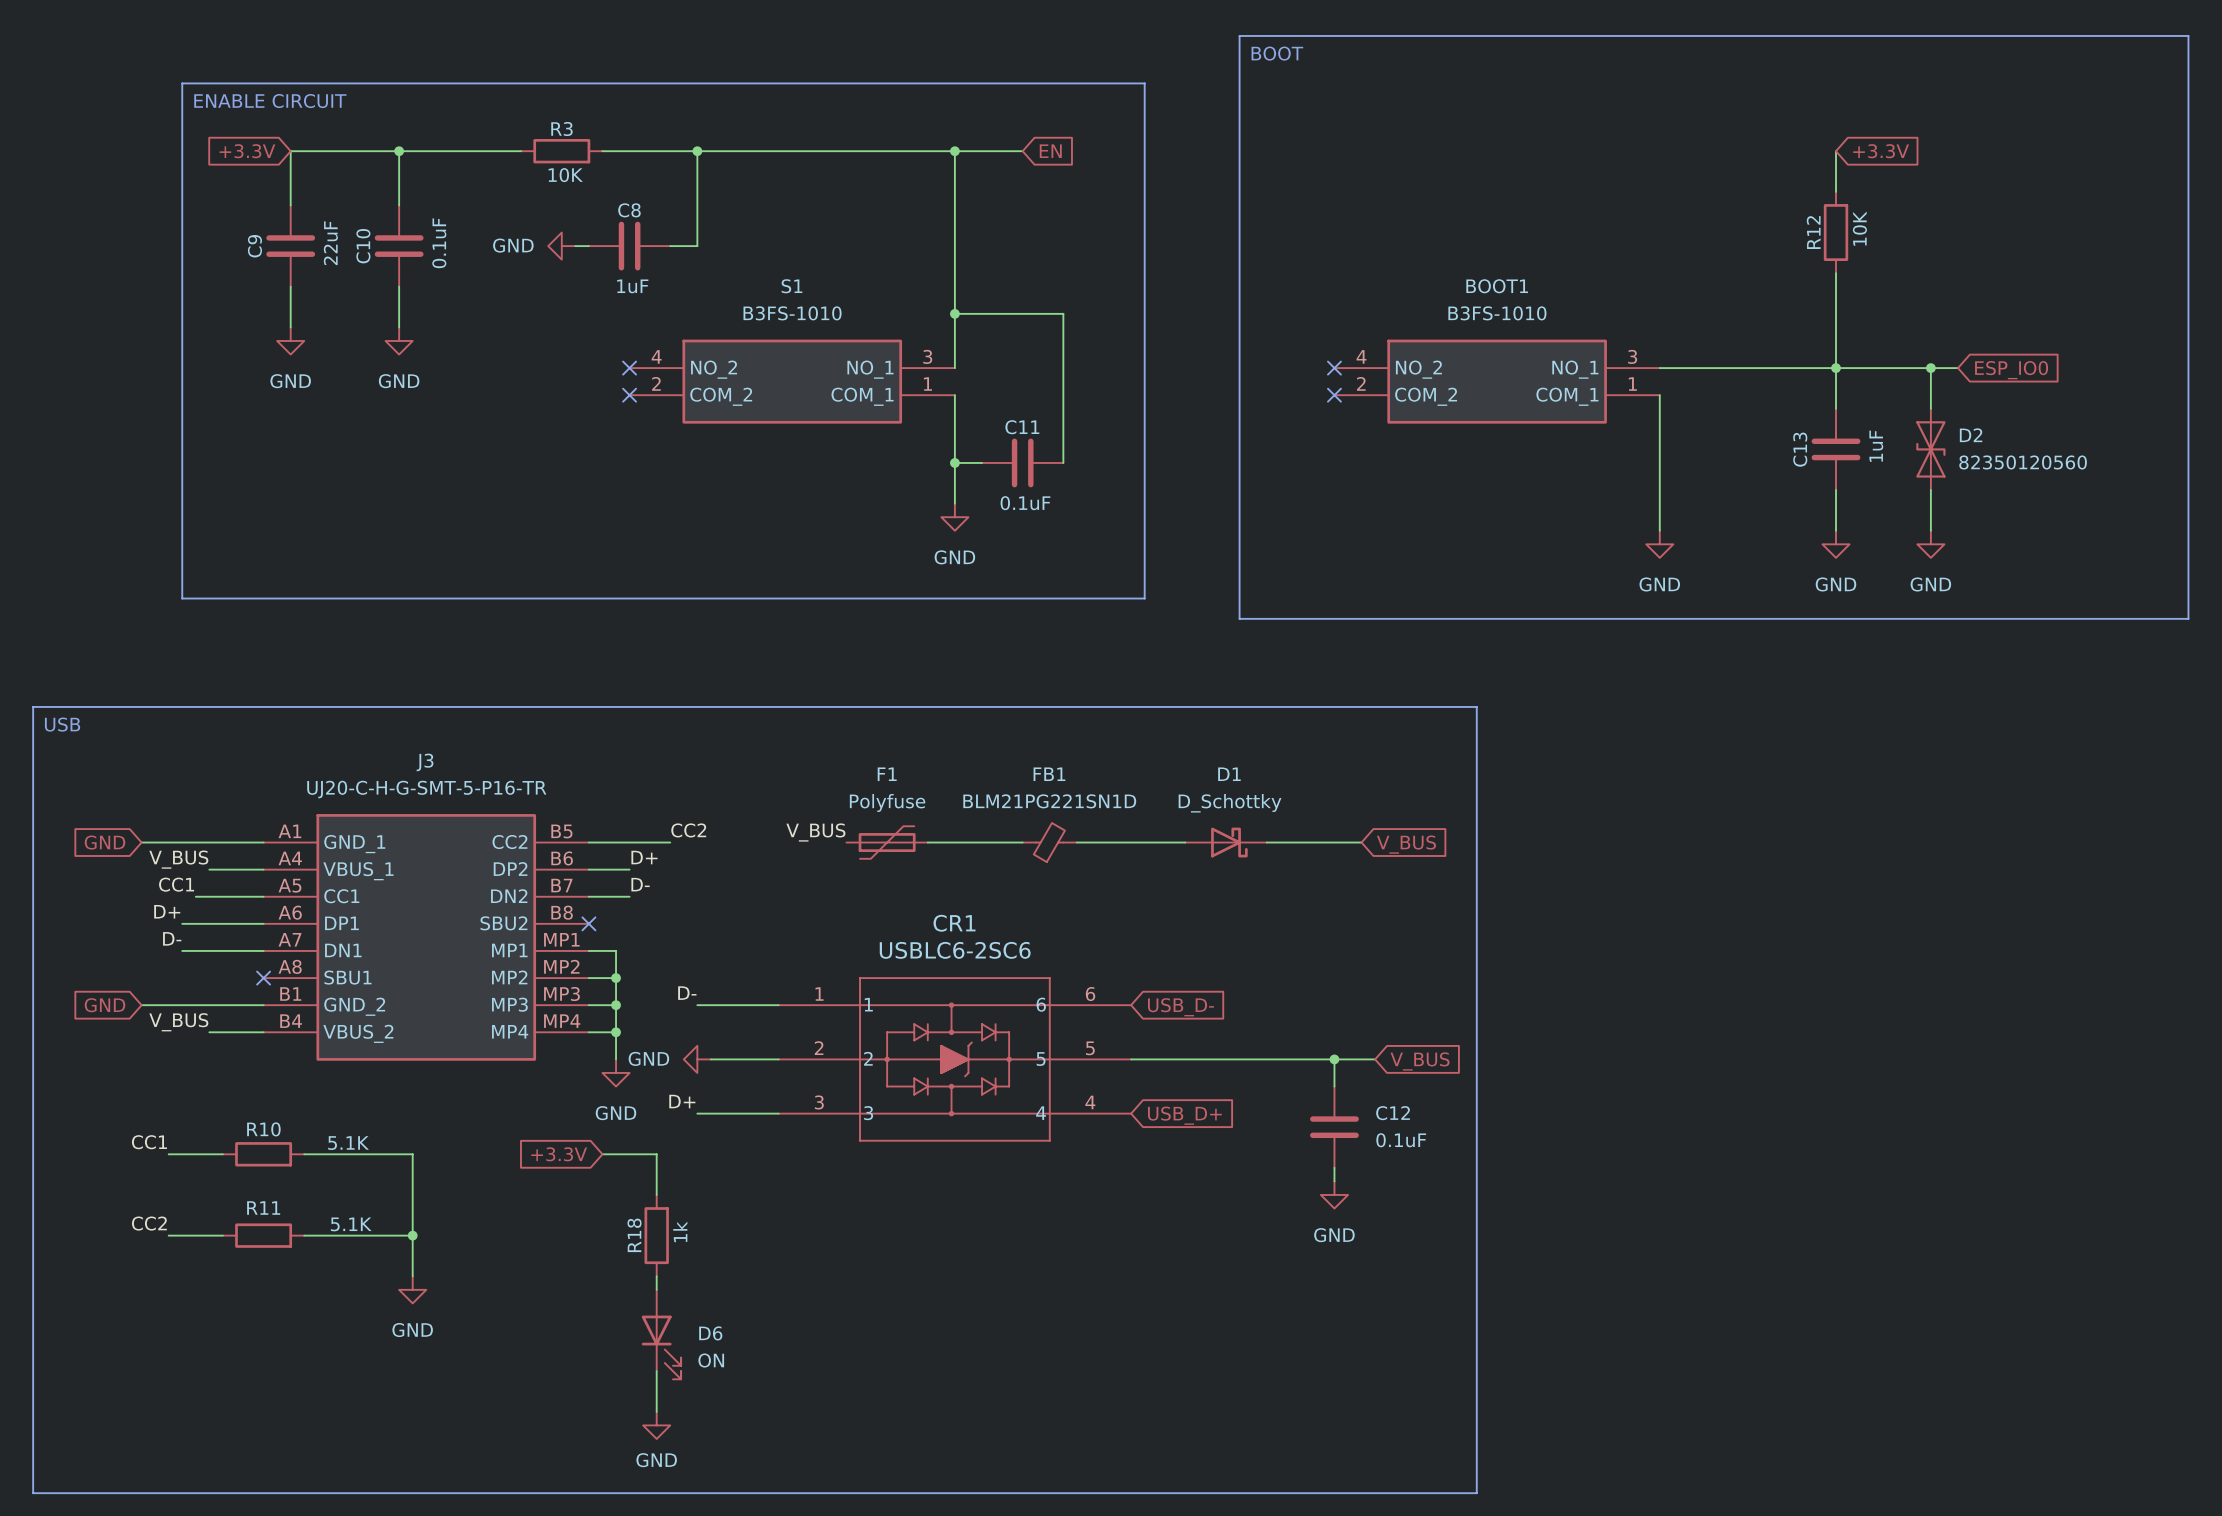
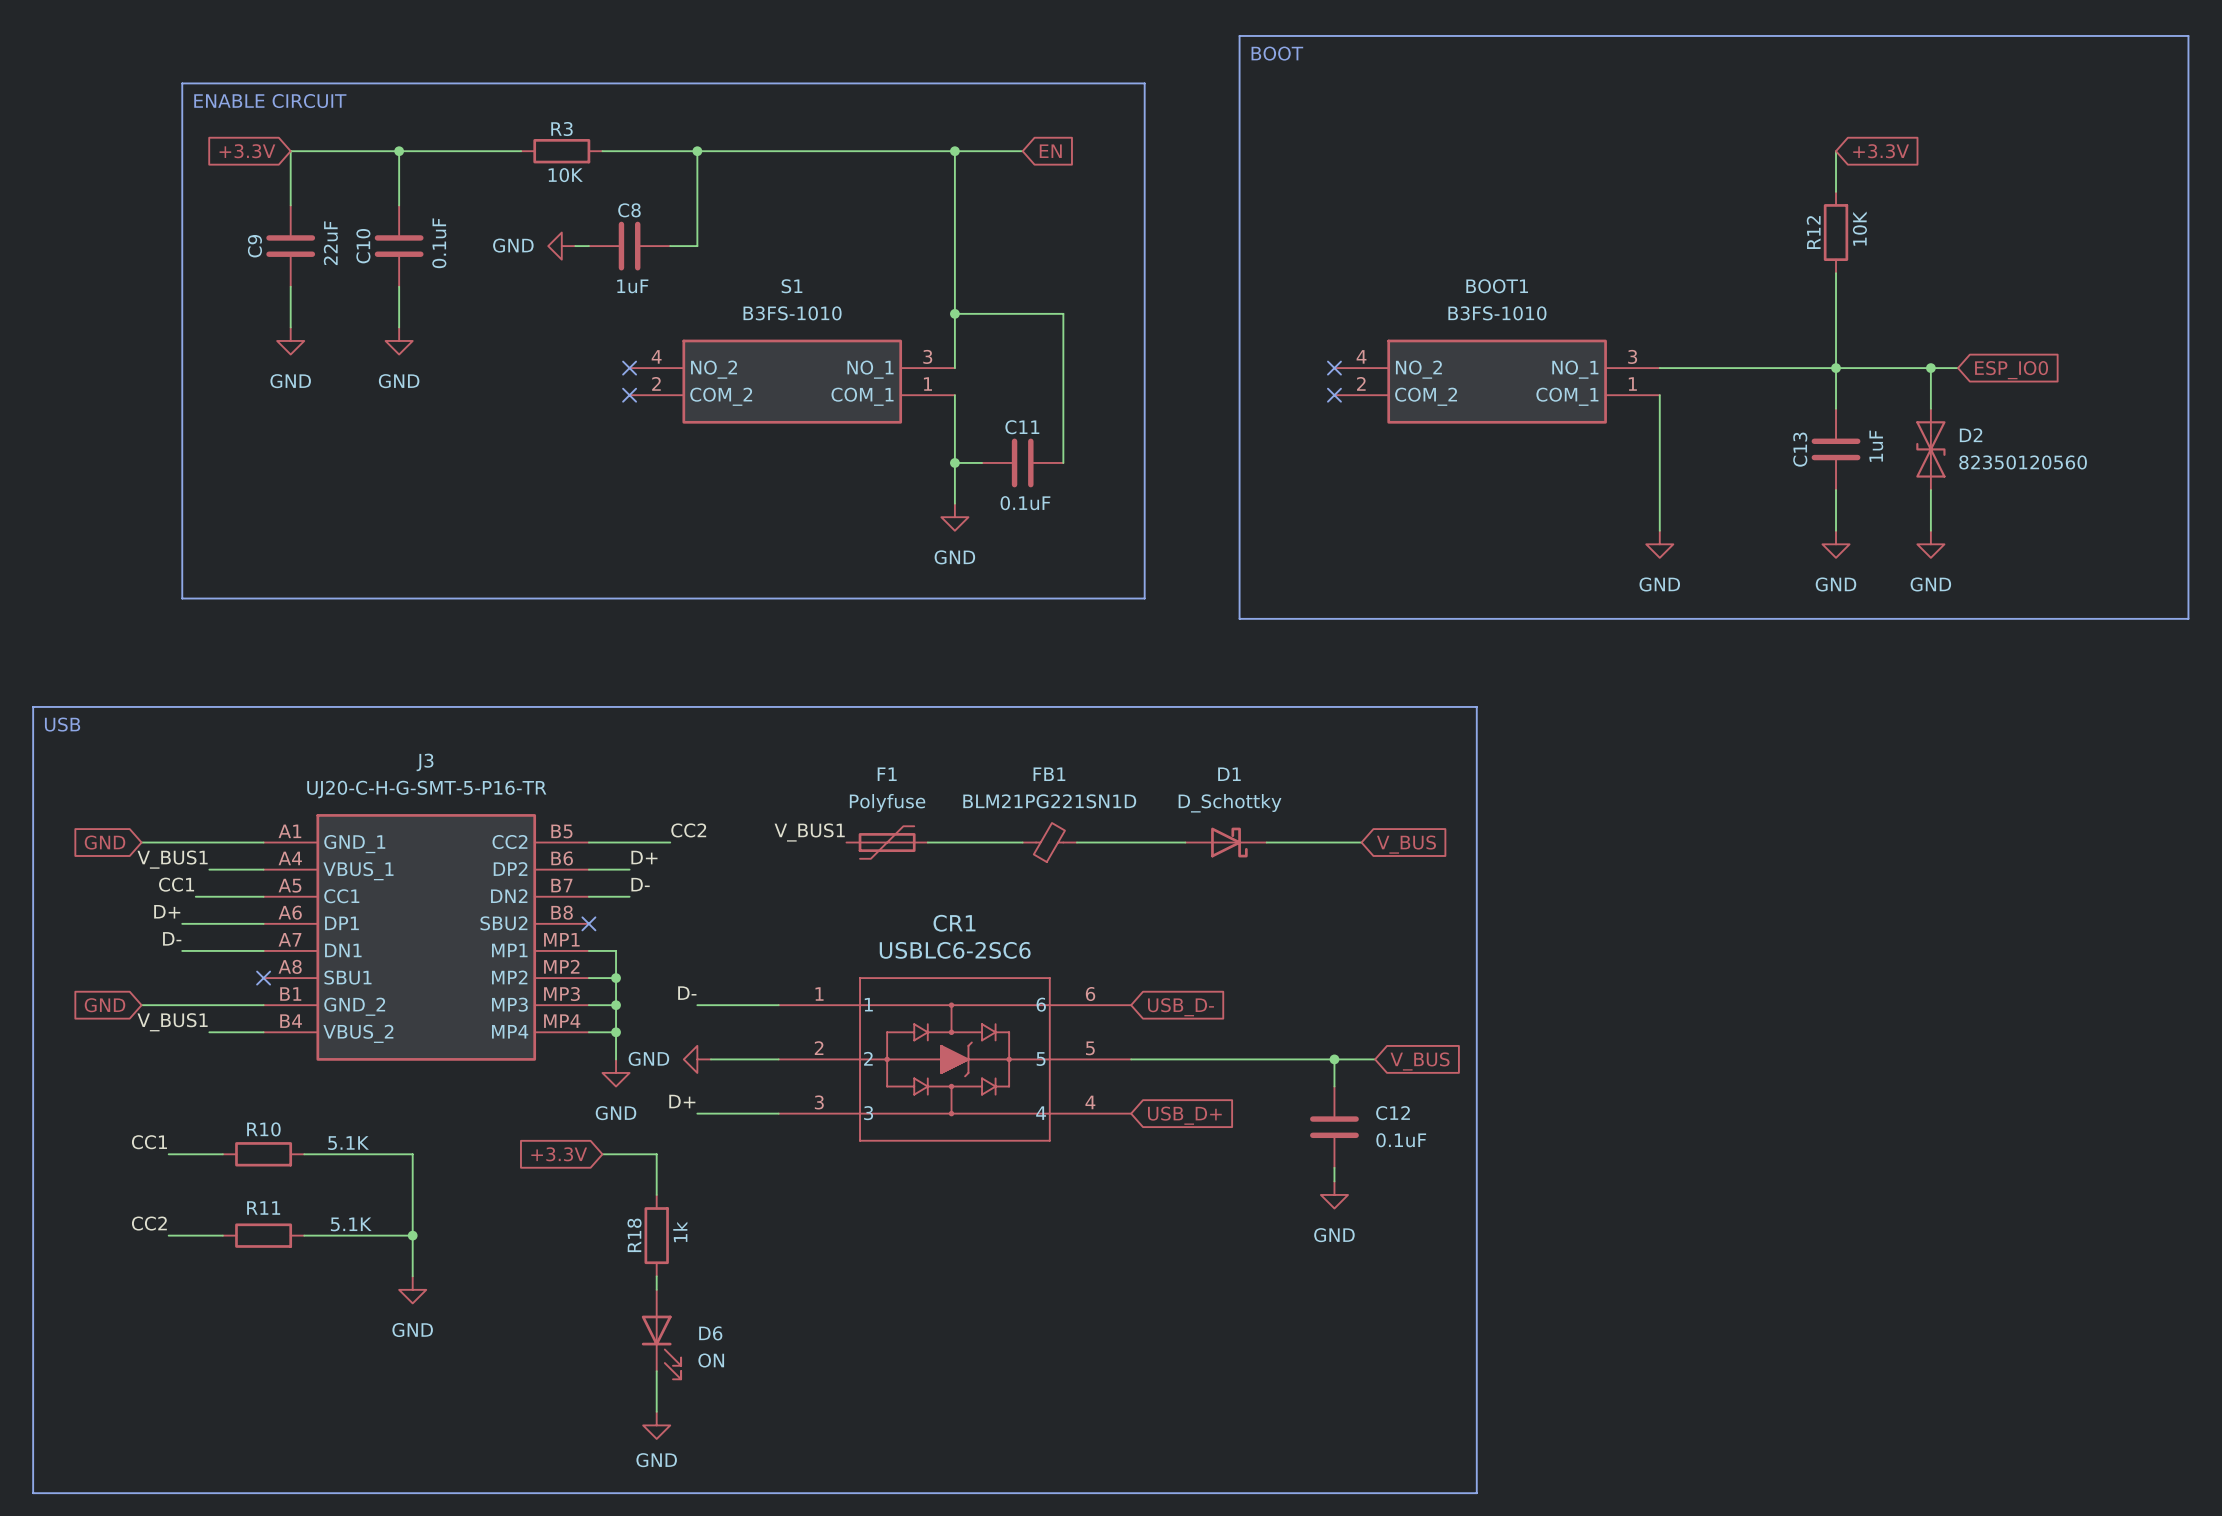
label: V_BUS (815, 832) -> V_BUS1 (809, 832)
label: V_BUS (178, 859) -> V_BUS1 (172, 859)
label: V_BUS (178, 1022) -> V_BUS1 (172, 1022)

